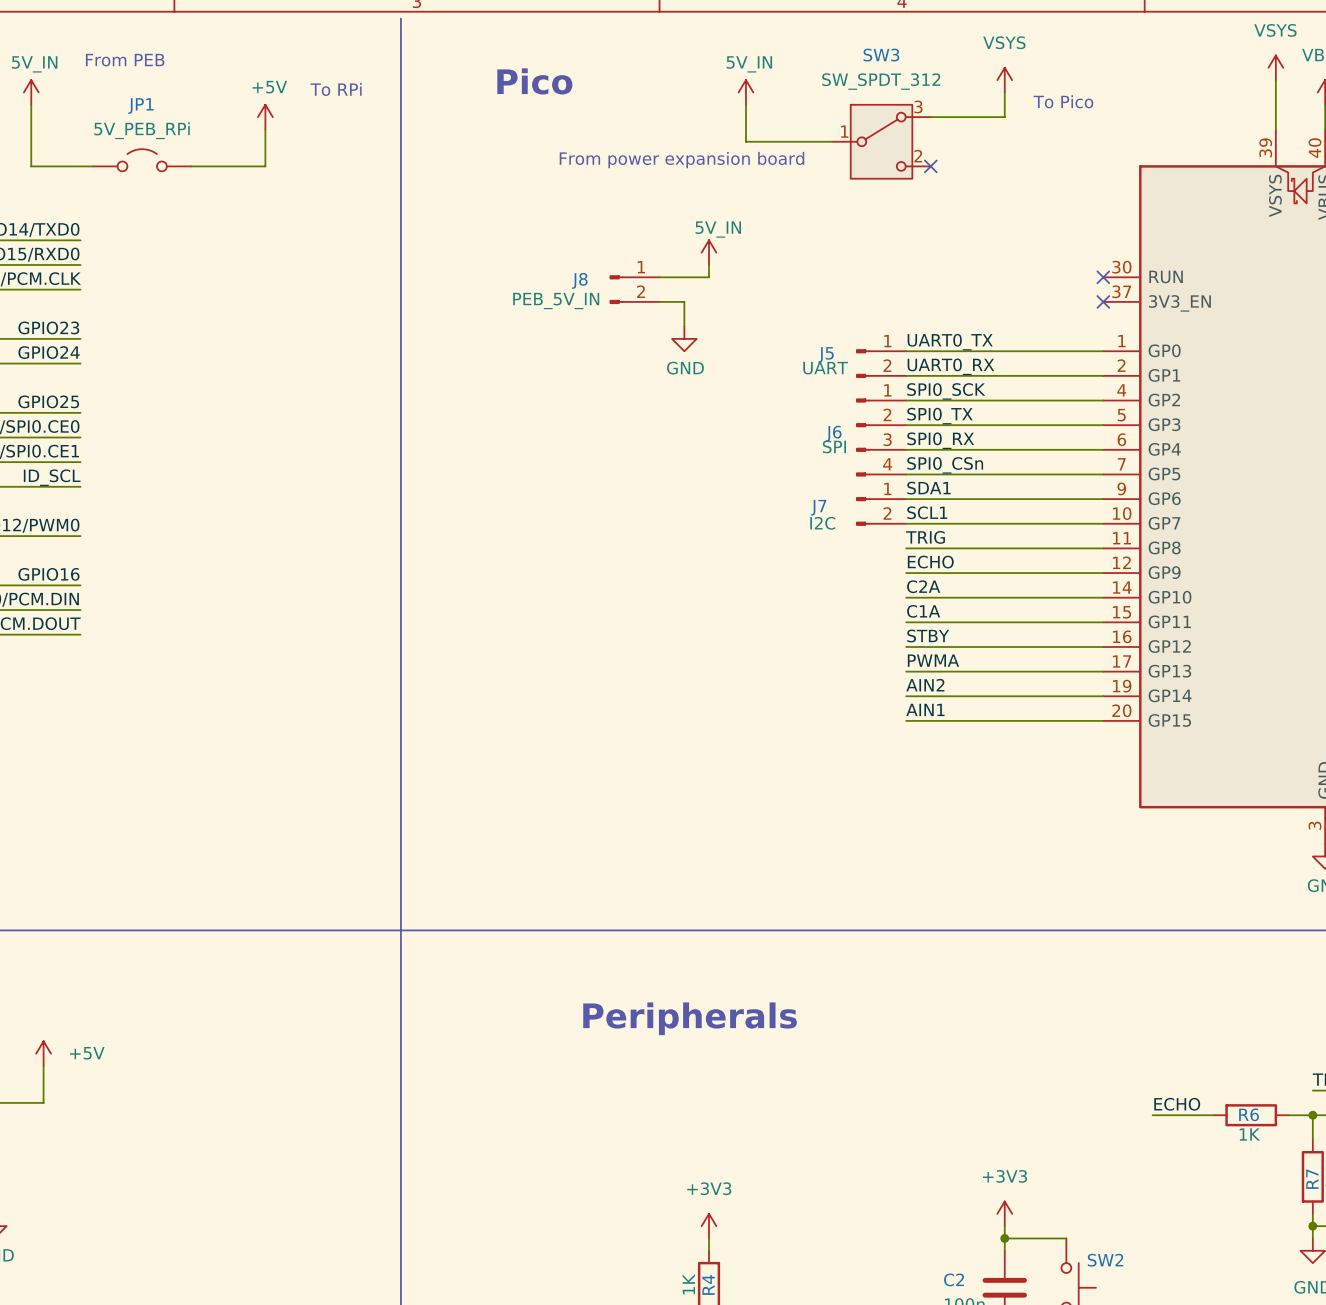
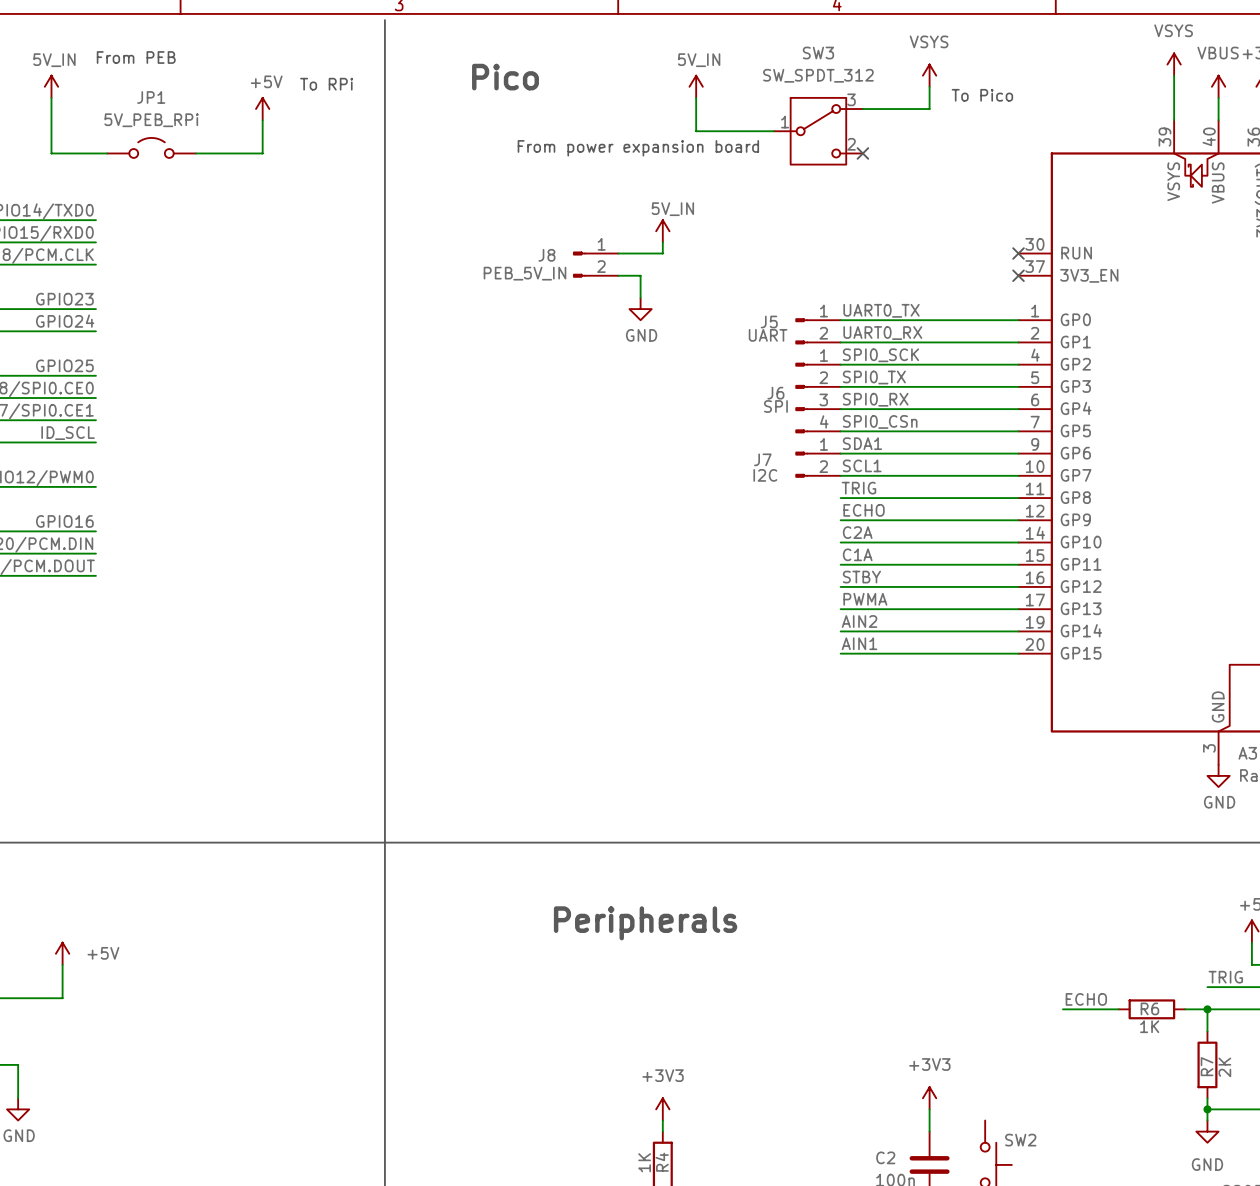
wire: (1004, 1238) (1066, 1238) -> none
junction: (1004, 1238) -> none

